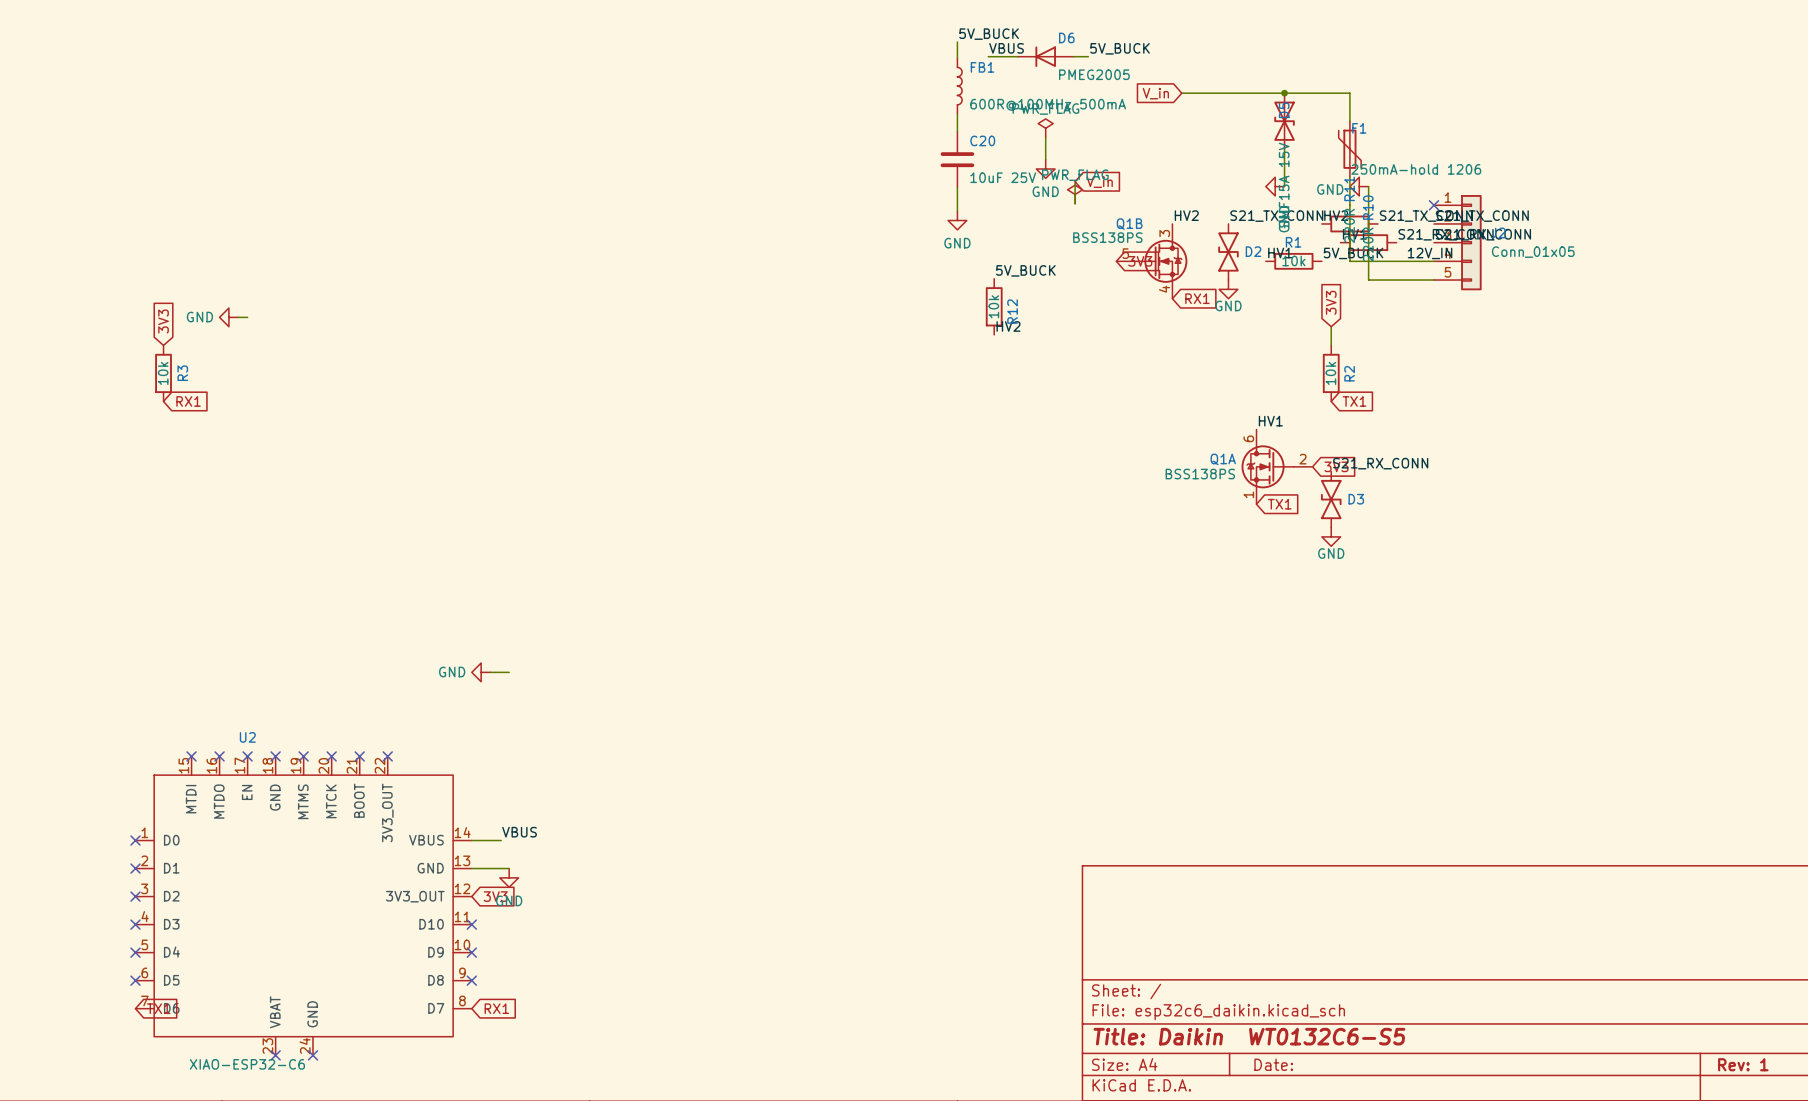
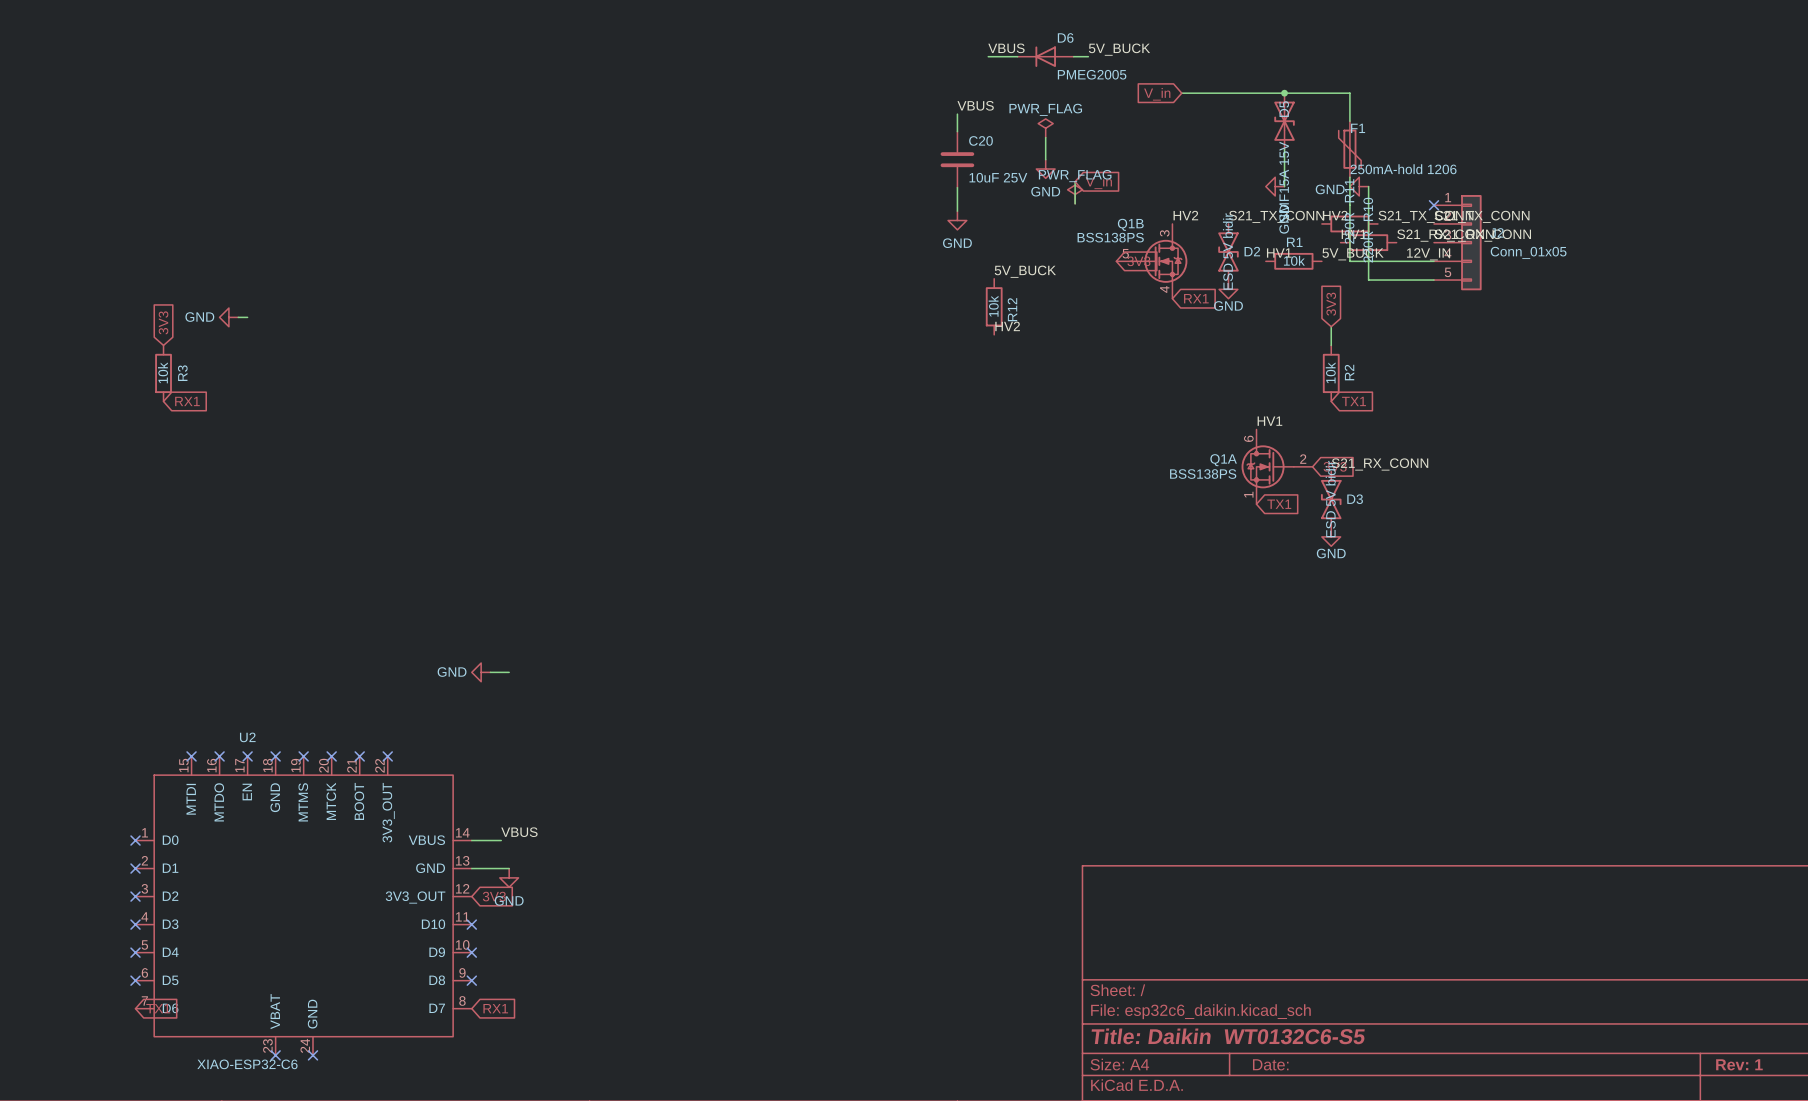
label: 5V_BUCK (989, 34) -> none
wire: (957, 41) (957, 58) -> none
FB1: 600R@100MHz 500mA (959, 86) -> none
label: none -> VBUS (975, 105)
D2 value: none -> ESD 5V bidir (1227, 251)
D3 value: none -> ESD 5V bidir (1330, 499)

